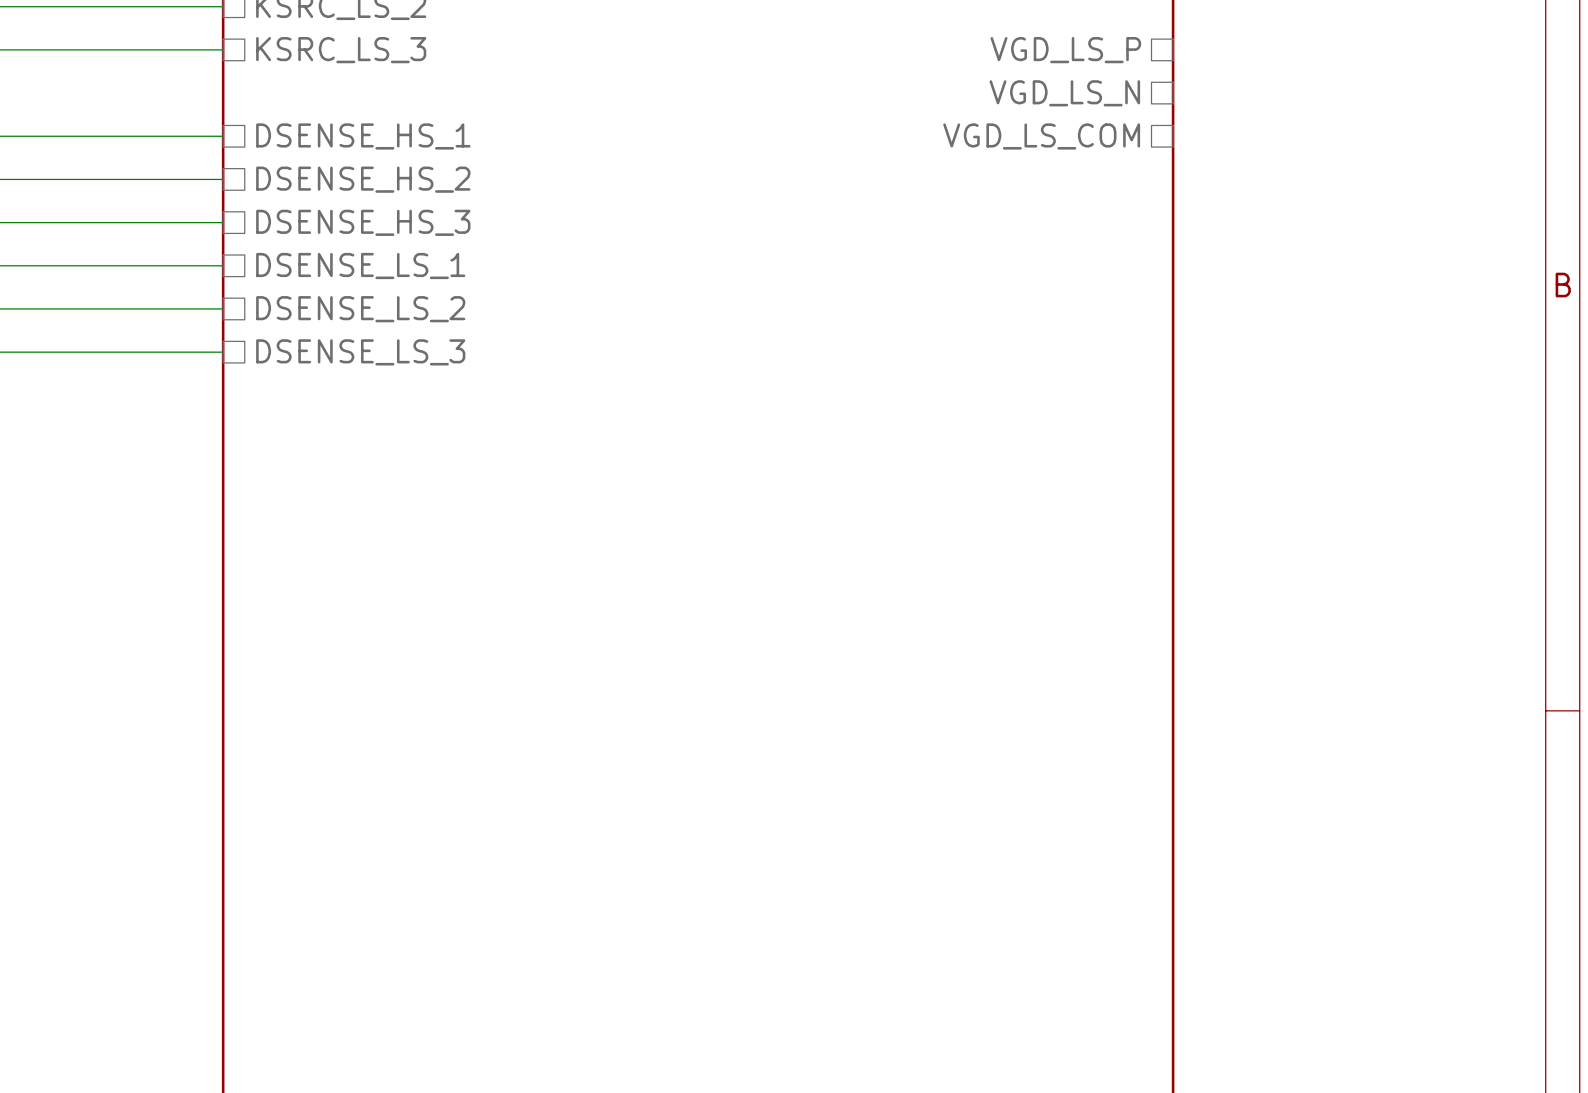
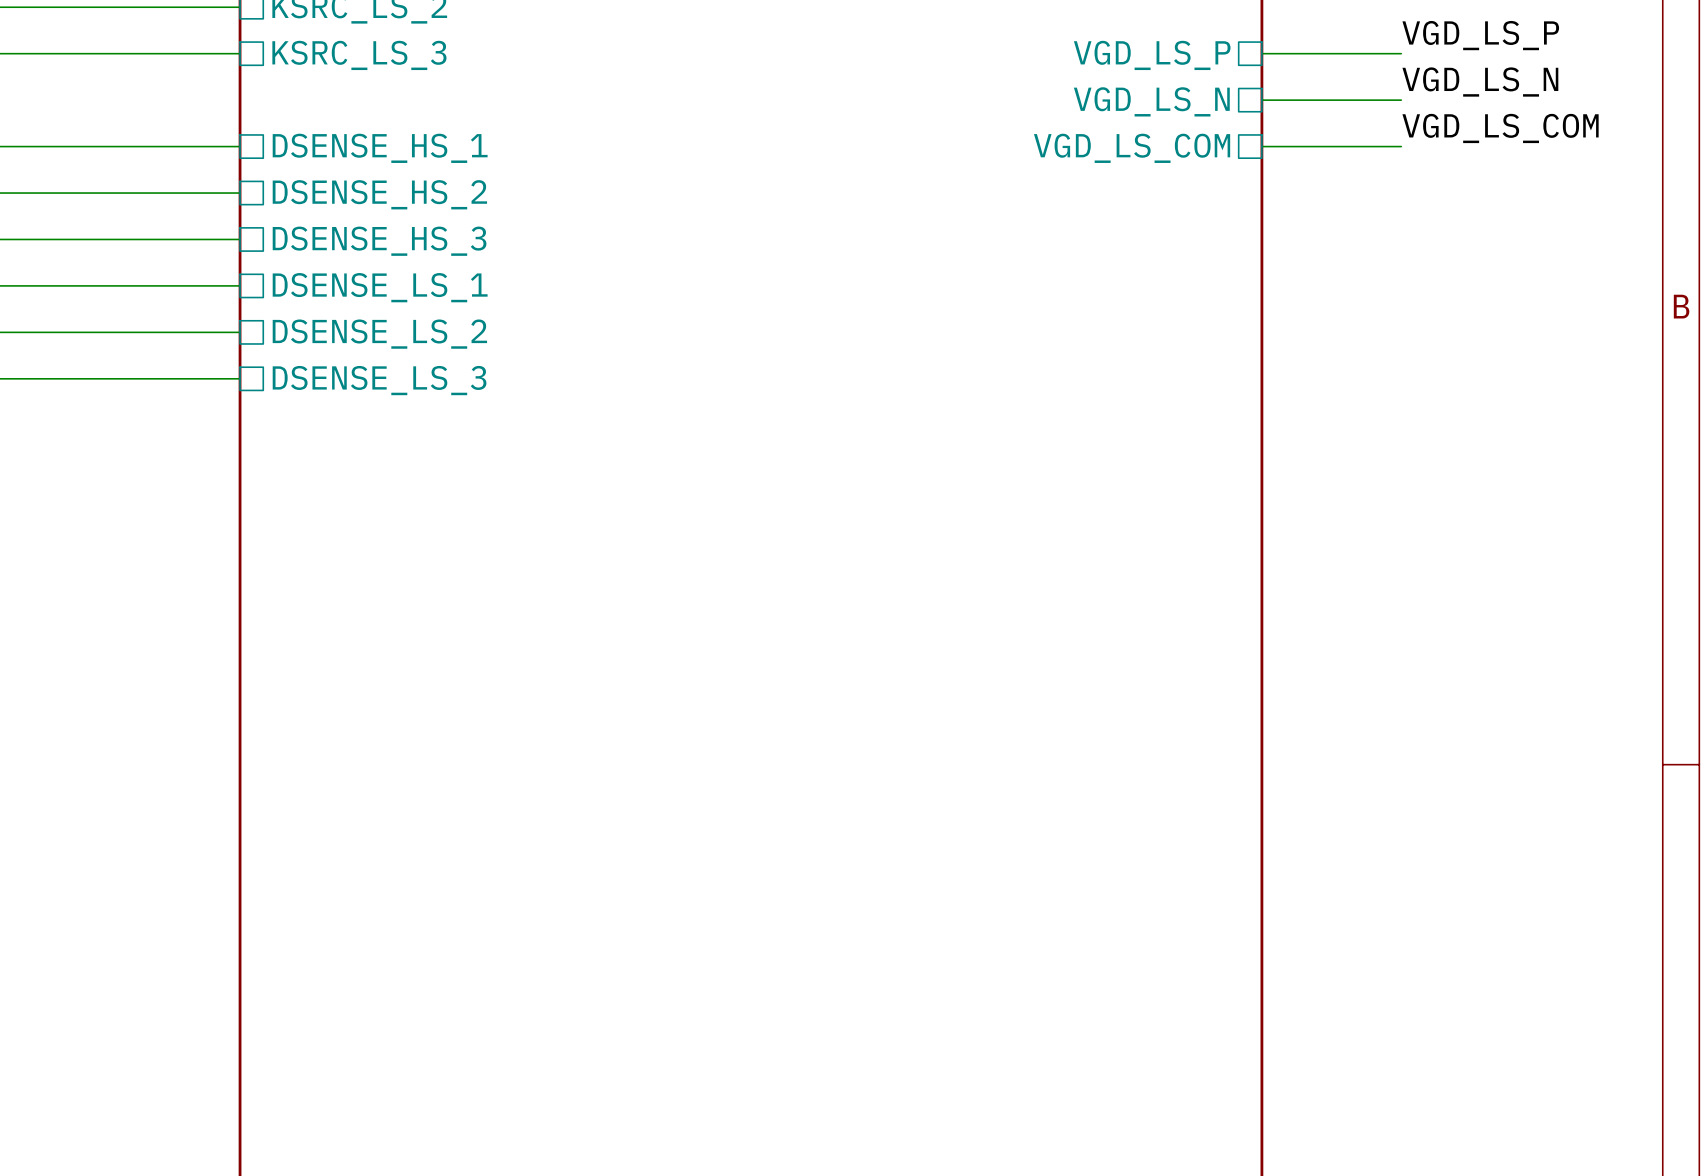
label: none -> VGD_LS_P (1480, 35)
wire: none -> (1261, 53) (1401, 53)
label: none -> VGD_LS_N (1480, 82)
wire: none -> (1261, 100) (1401, 100)
label: none -> VGD_LS_COM (1500, 128)
wire: none -> (1261, 146) (1401, 146)

